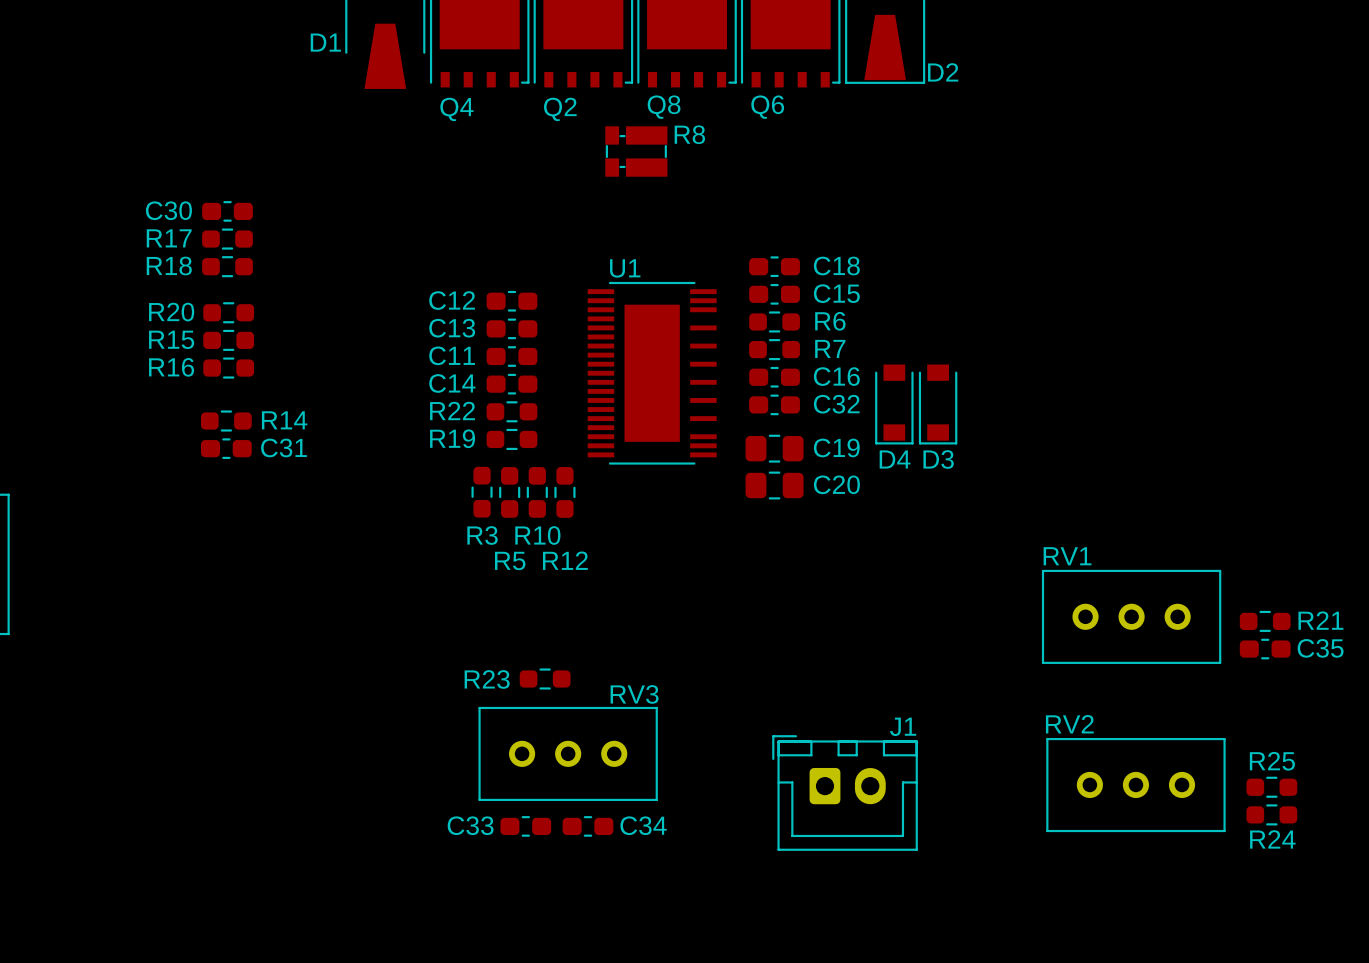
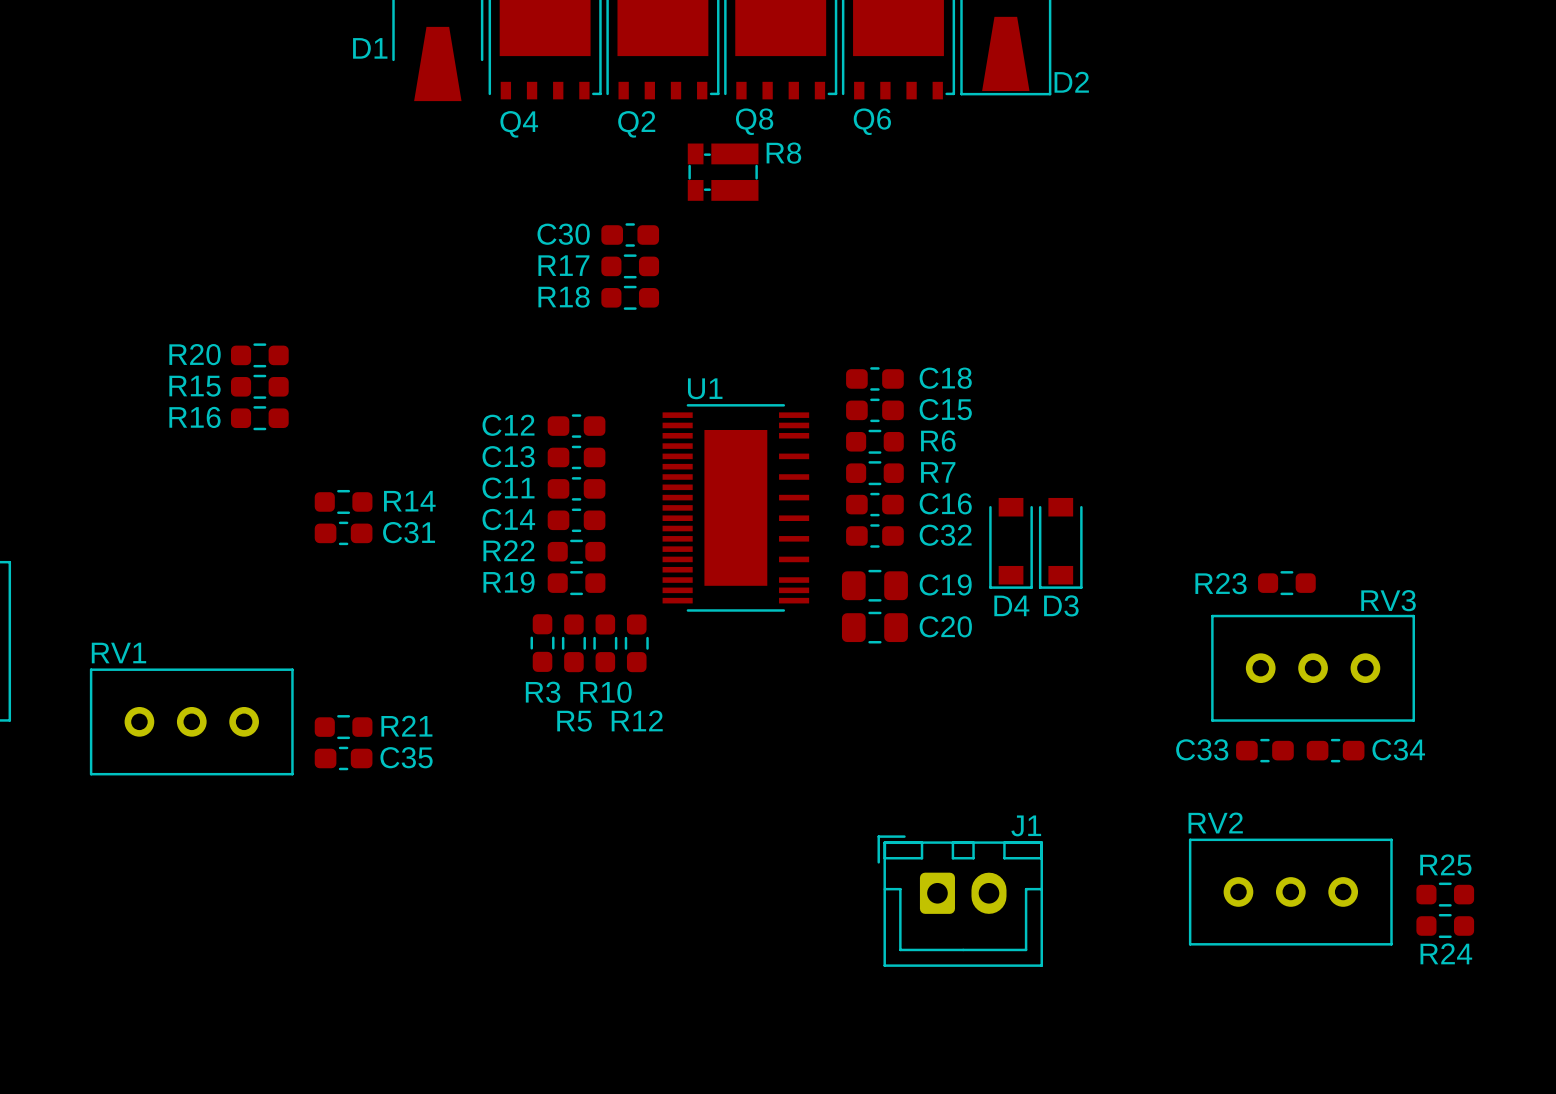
C30 position: (227, 211) -> (630, 234)
R17 position: (227, 239) -> (630, 266)
R18 position: (227, 266) -> (630, 297)
C18 position: (774, 266) -> (874, 378)
C15 position: (774, 294) -> (874, 410)
C12 position: (511, 301) -> (576, 426)
R6 position: (774, 321) -> (874, 441)
C13 position: (511, 328) -> (576, 457)
R7 position: (774, 349) -> (874, 473)
C11 position: (511, 356) -> (576, 488)
part position: (652, 373) -> (735, 507)
C16 position: (774, 377) -> (874, 504)
C14 position: (511, 384) -> (576, 520)
C32 position: (774, 404) -> (874, 536)
D4 position: (894, 404) -> (1011, 543)
D3 position: (938, 404) -> (1060, 543)
R22 position: (511, 411) -> (576, 551)
R14 position: (226, 421) -> (343, 501)
R19 position: (511, 439) -> (576, 583)
C31 position: (226, 448) -> (343, 533)
C19 position: (774, 448) -> (874, 585)
C20 position: (774, 485) -> (874, 627)
R3 position: (482, 492) -> (542, 643)
R5 position: (509, 492) -> (573, 643)
R10 position: (537, 492) -> (605, 643)
R12 position: (564, 492) -> (636, 643)
RV1 position: (1131, 616) -> (191, 721)
R21 position: (1265, 621) -> (343, 727)
C35 position: (1265, 649) -> (343, 758)
R23 position: (545, 678) -> (1286, 583)
RV3 position: (568, 753) -> (1313, 668)
C33 position: (525, 826) -> (1264, 750)
C34 position: (587, 826) -> (1335, 750)

